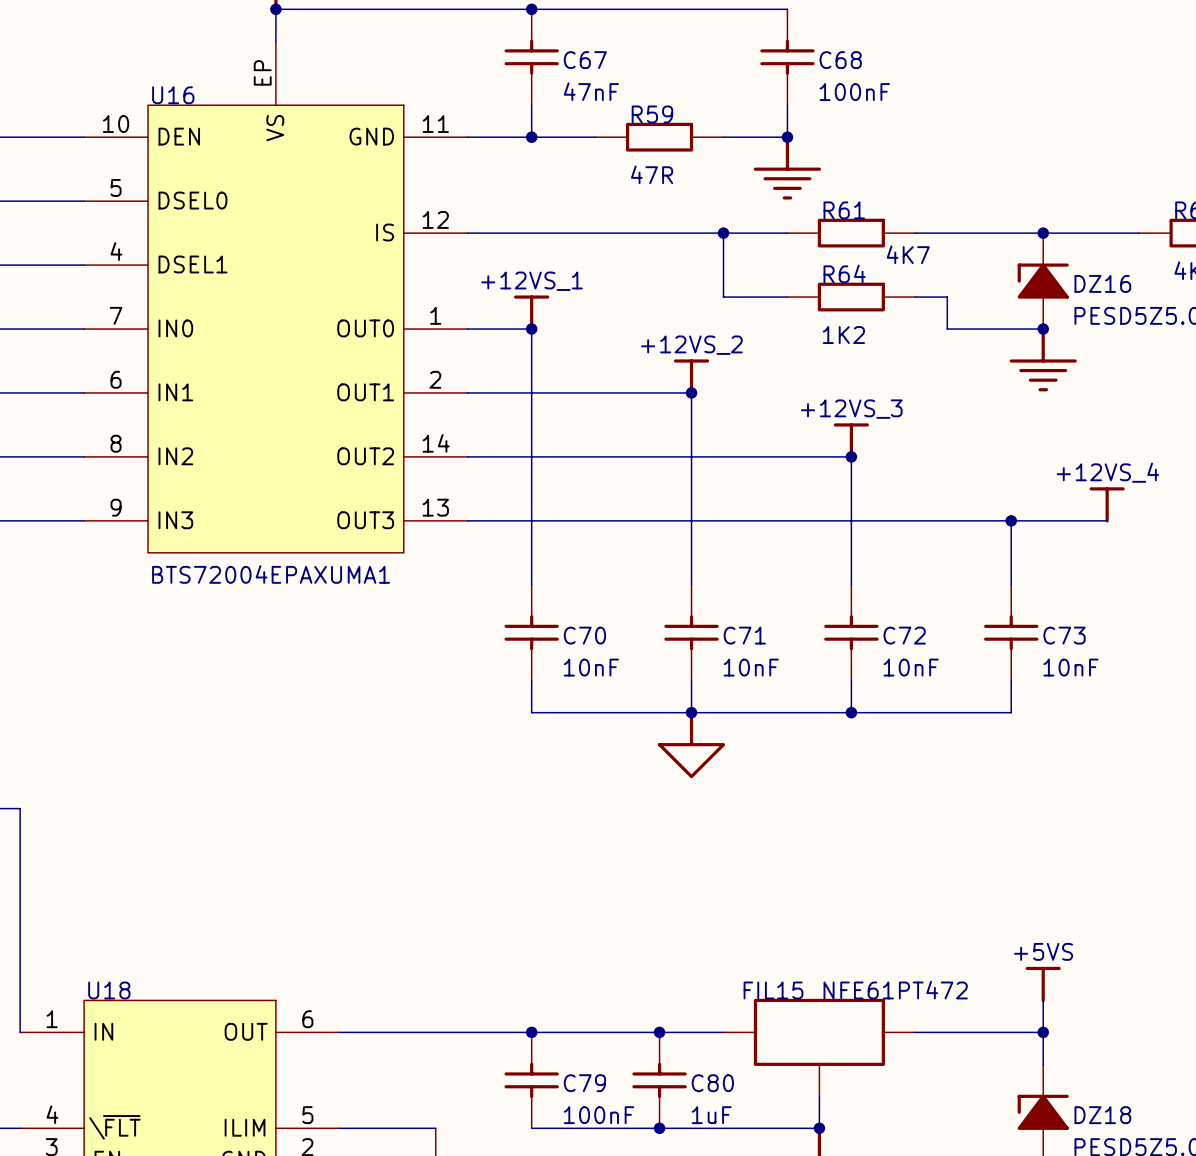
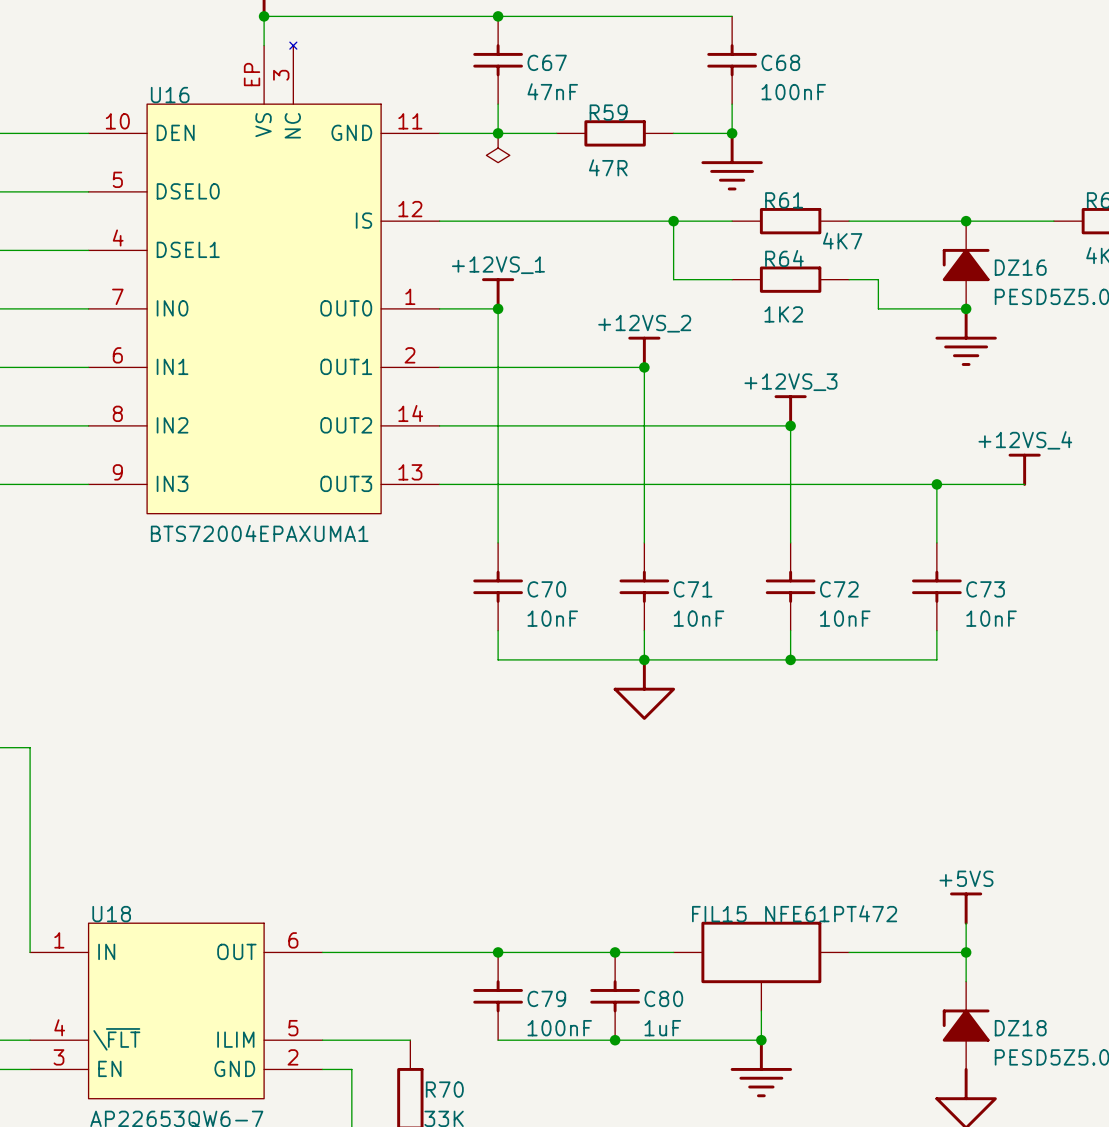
U16 symbol: [84, 41, 468, 553] -> [88, 42, 440, 514]
power symbol: none -> (498, 148)

